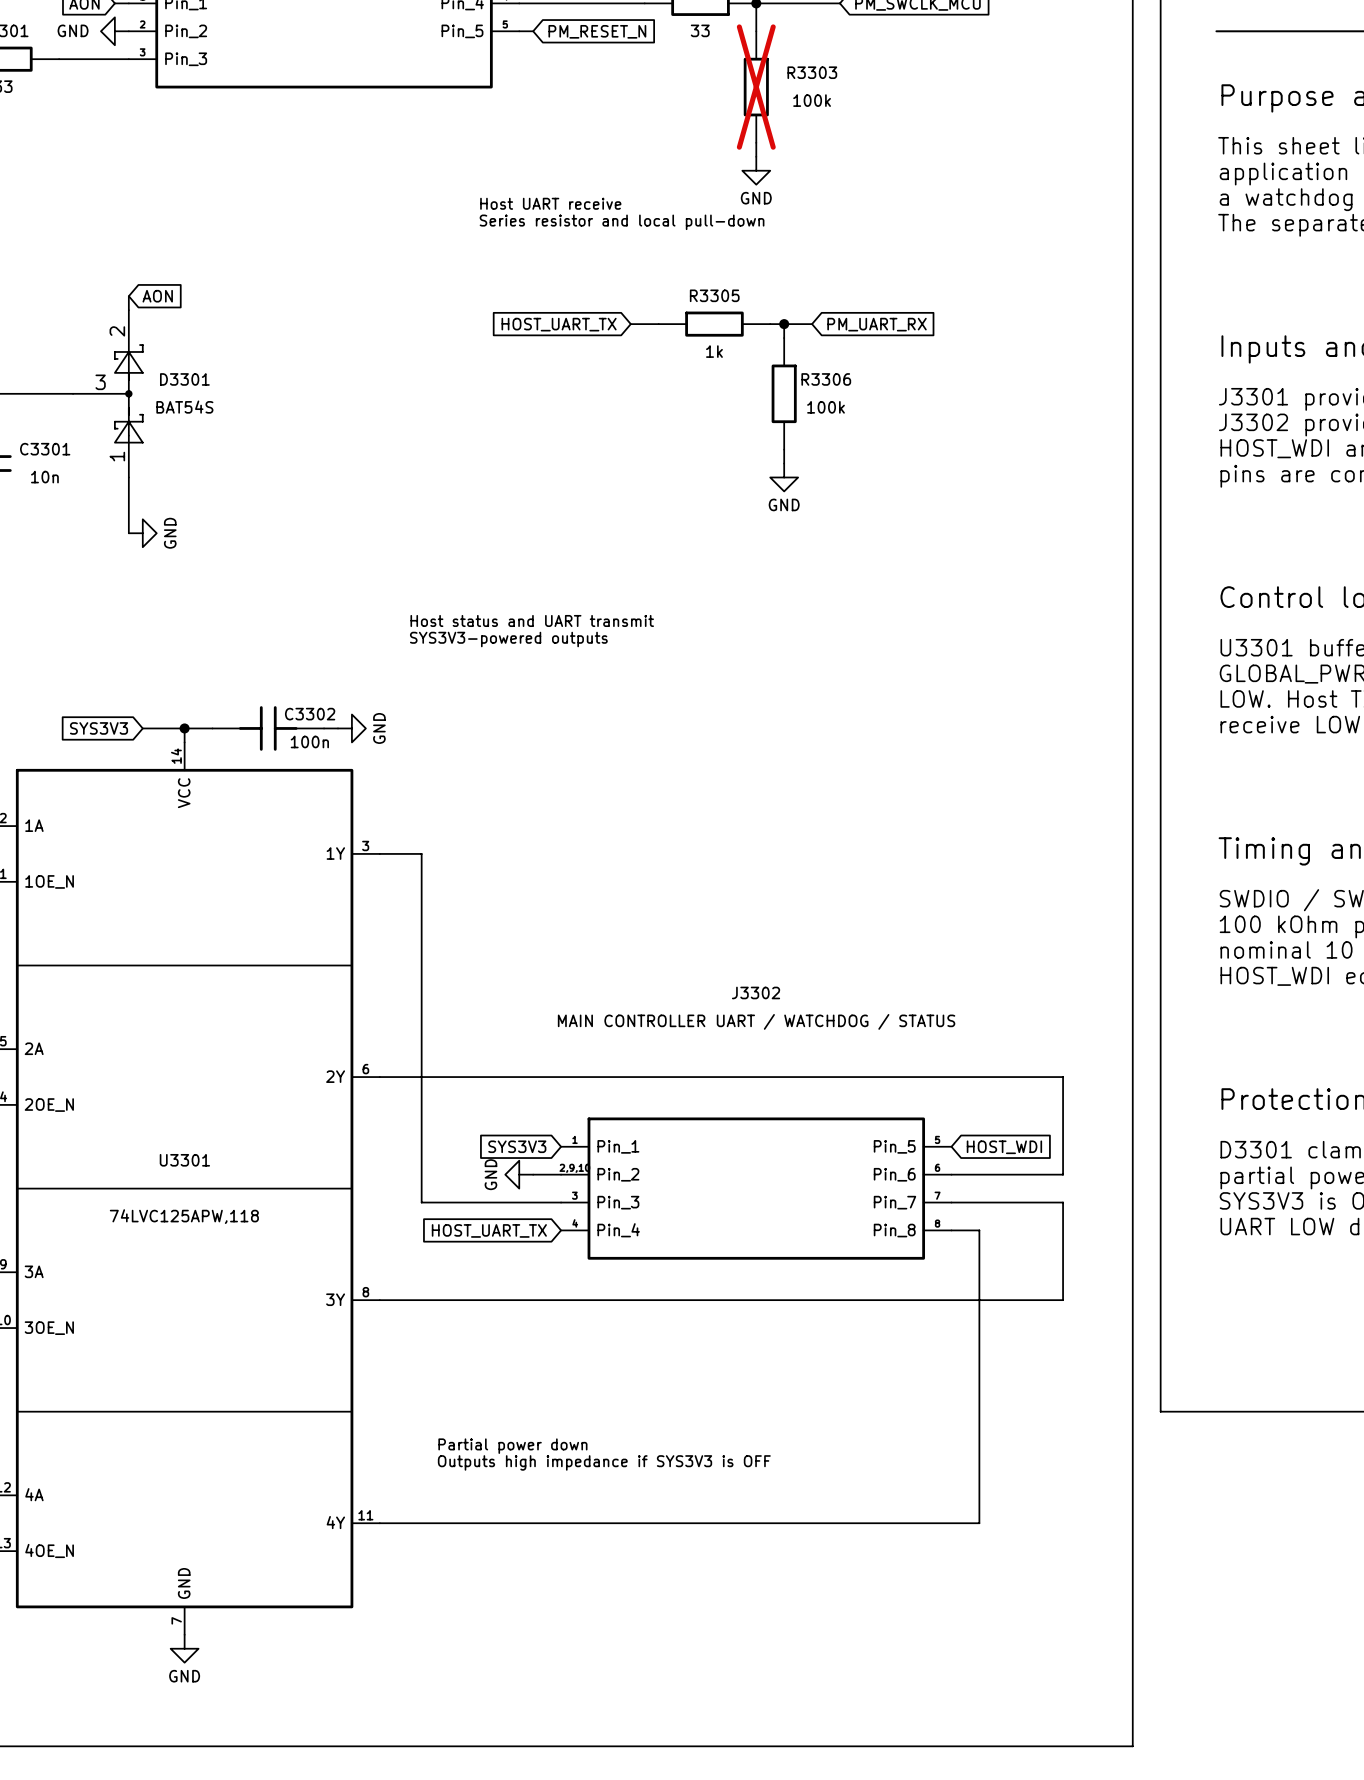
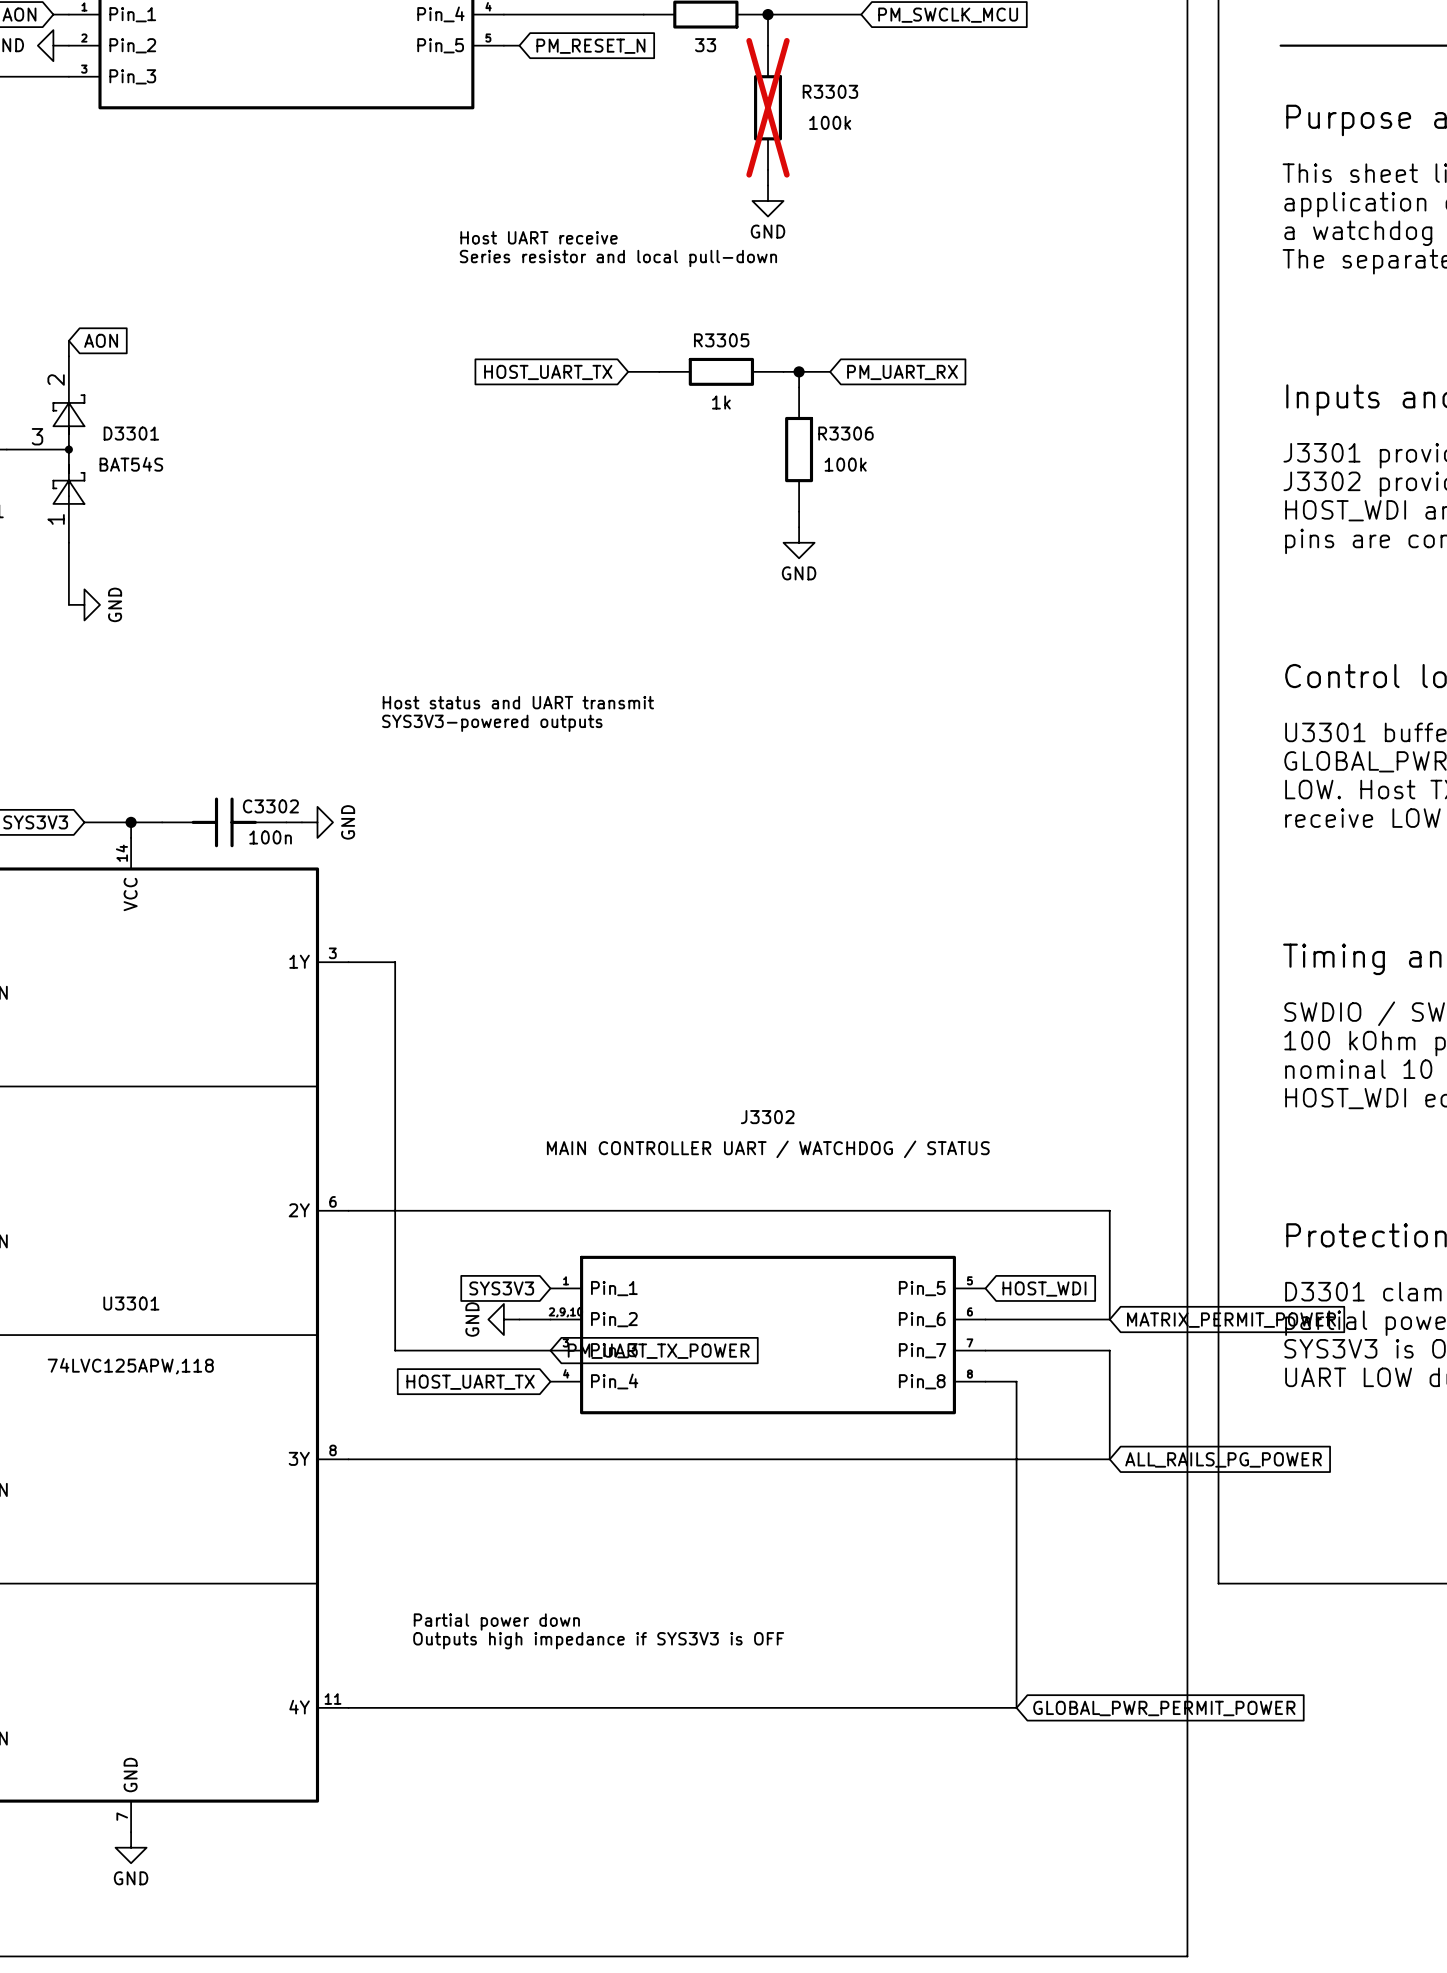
global label: none -> MATRIX_PERMIT_POWER (1231, 1320)
global label: none -> PM_UART_TX_POWER (658, 1351)
global label: none -> ALL_RAILS_PG_POWER (1223, 1459)
global label: none -> GLOBAL_PWR_PERMIT_POWER (1164, 1708)

